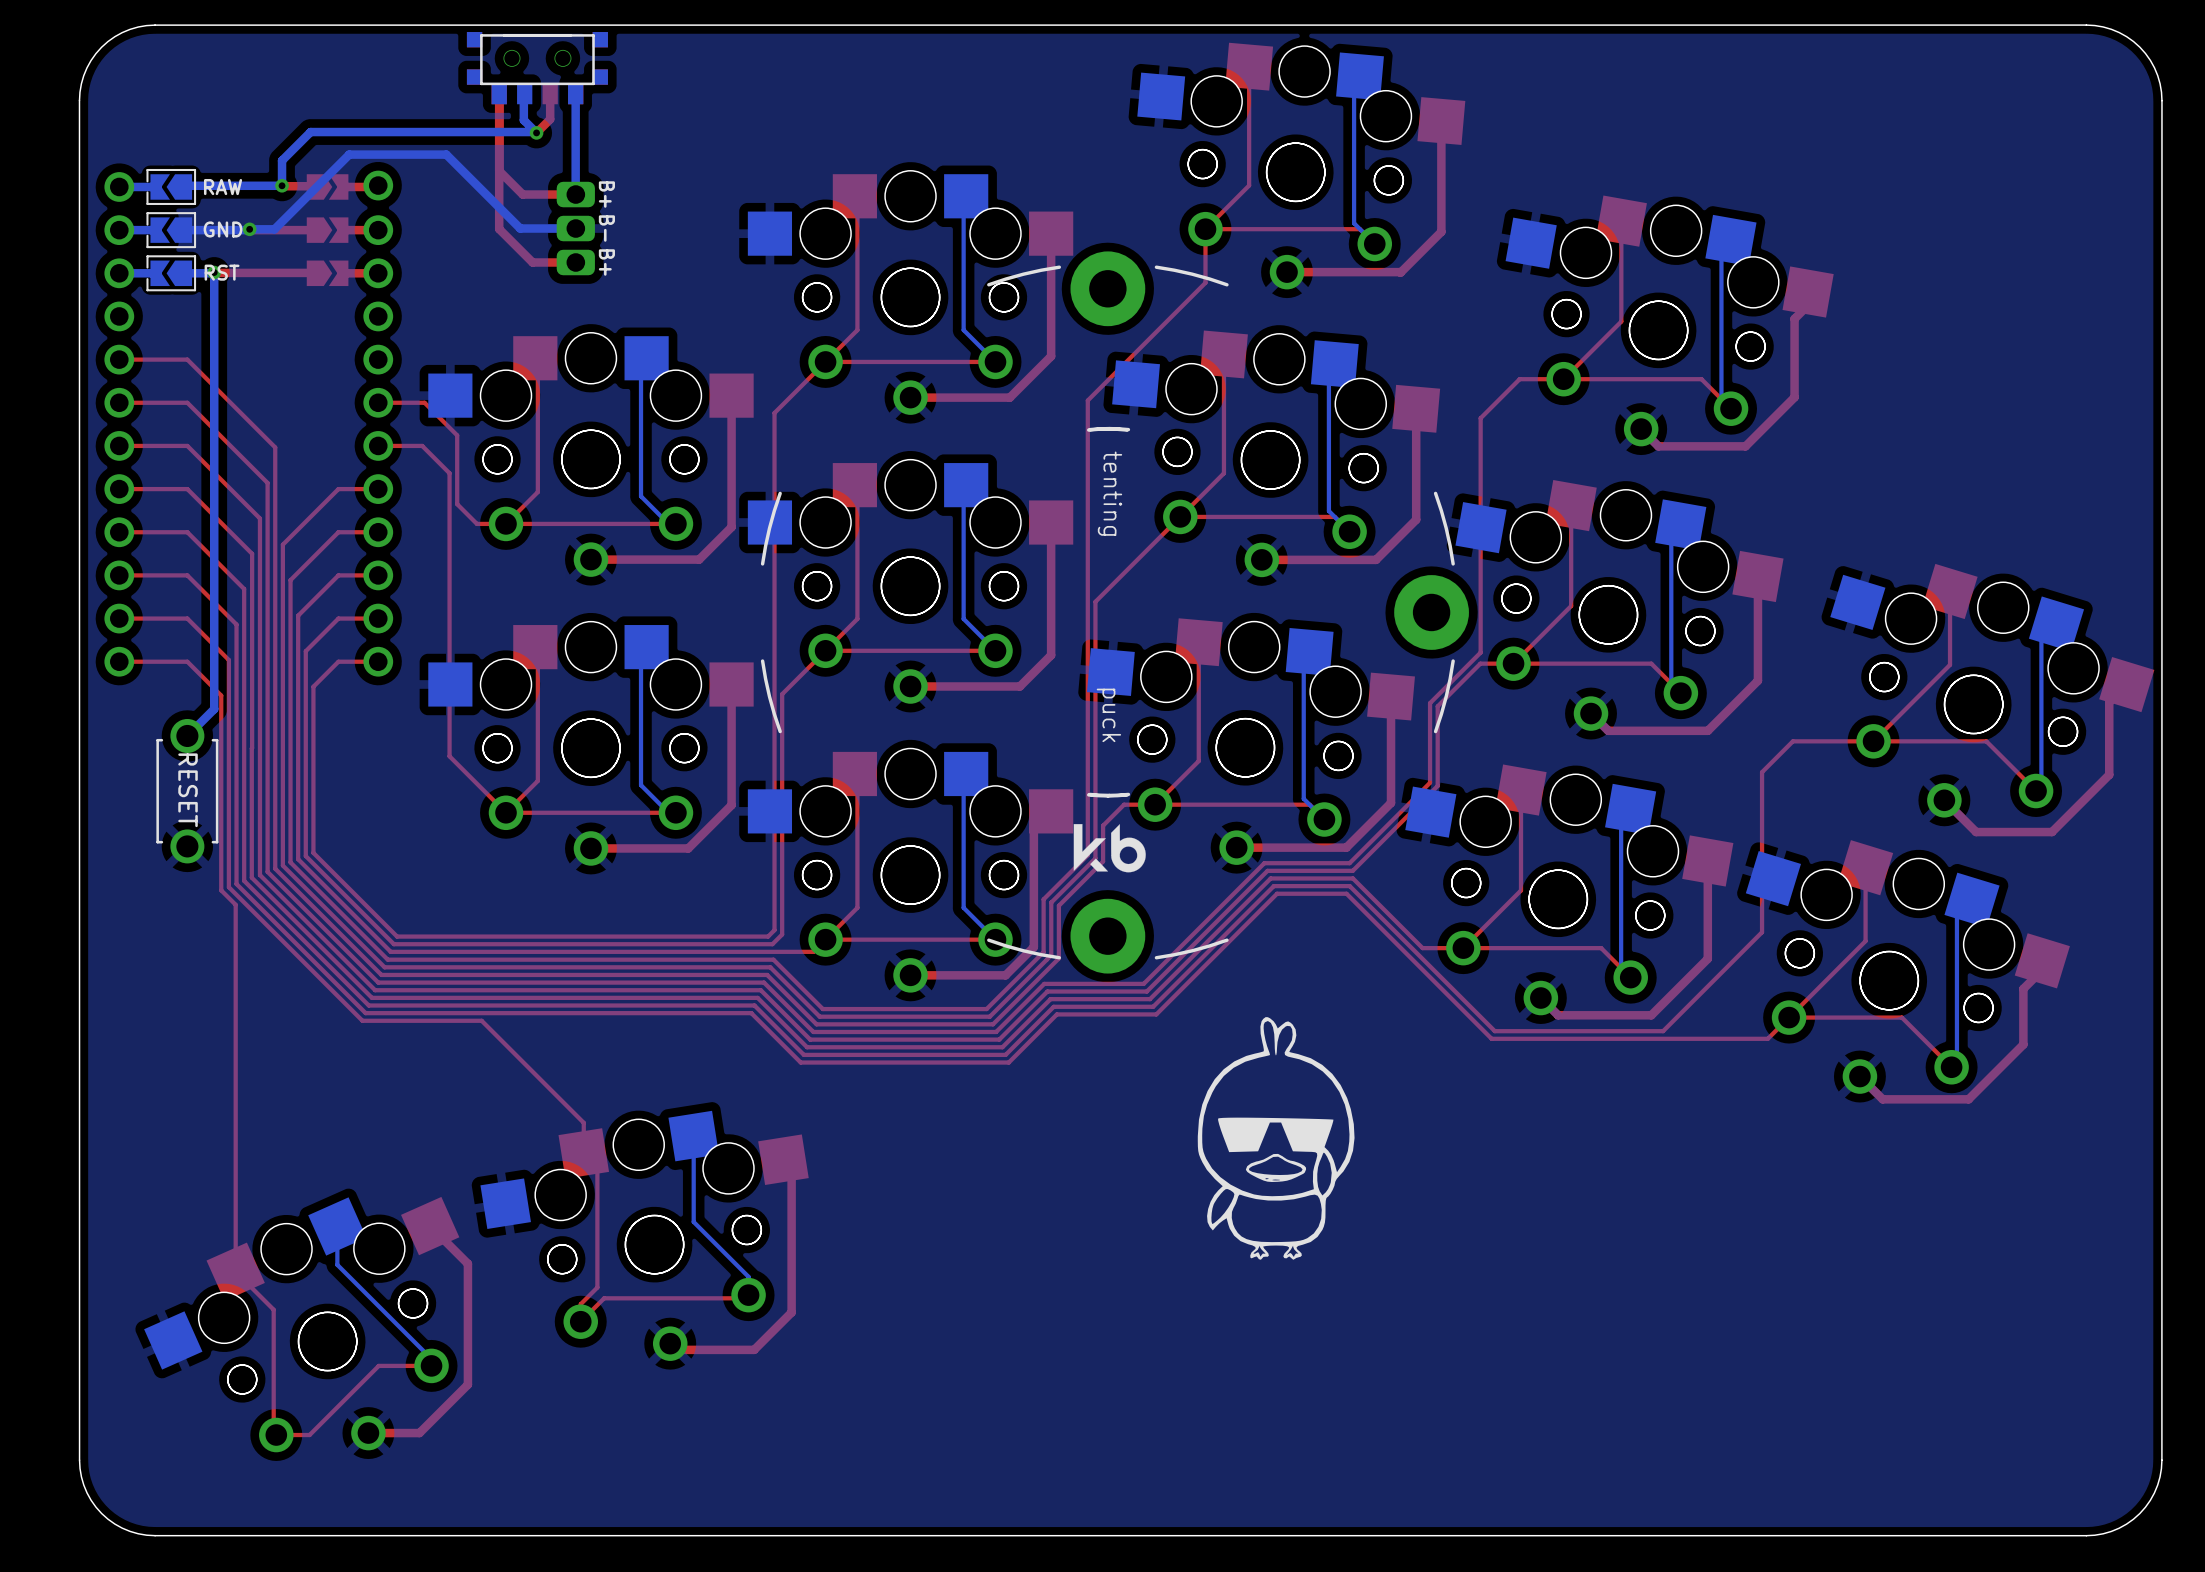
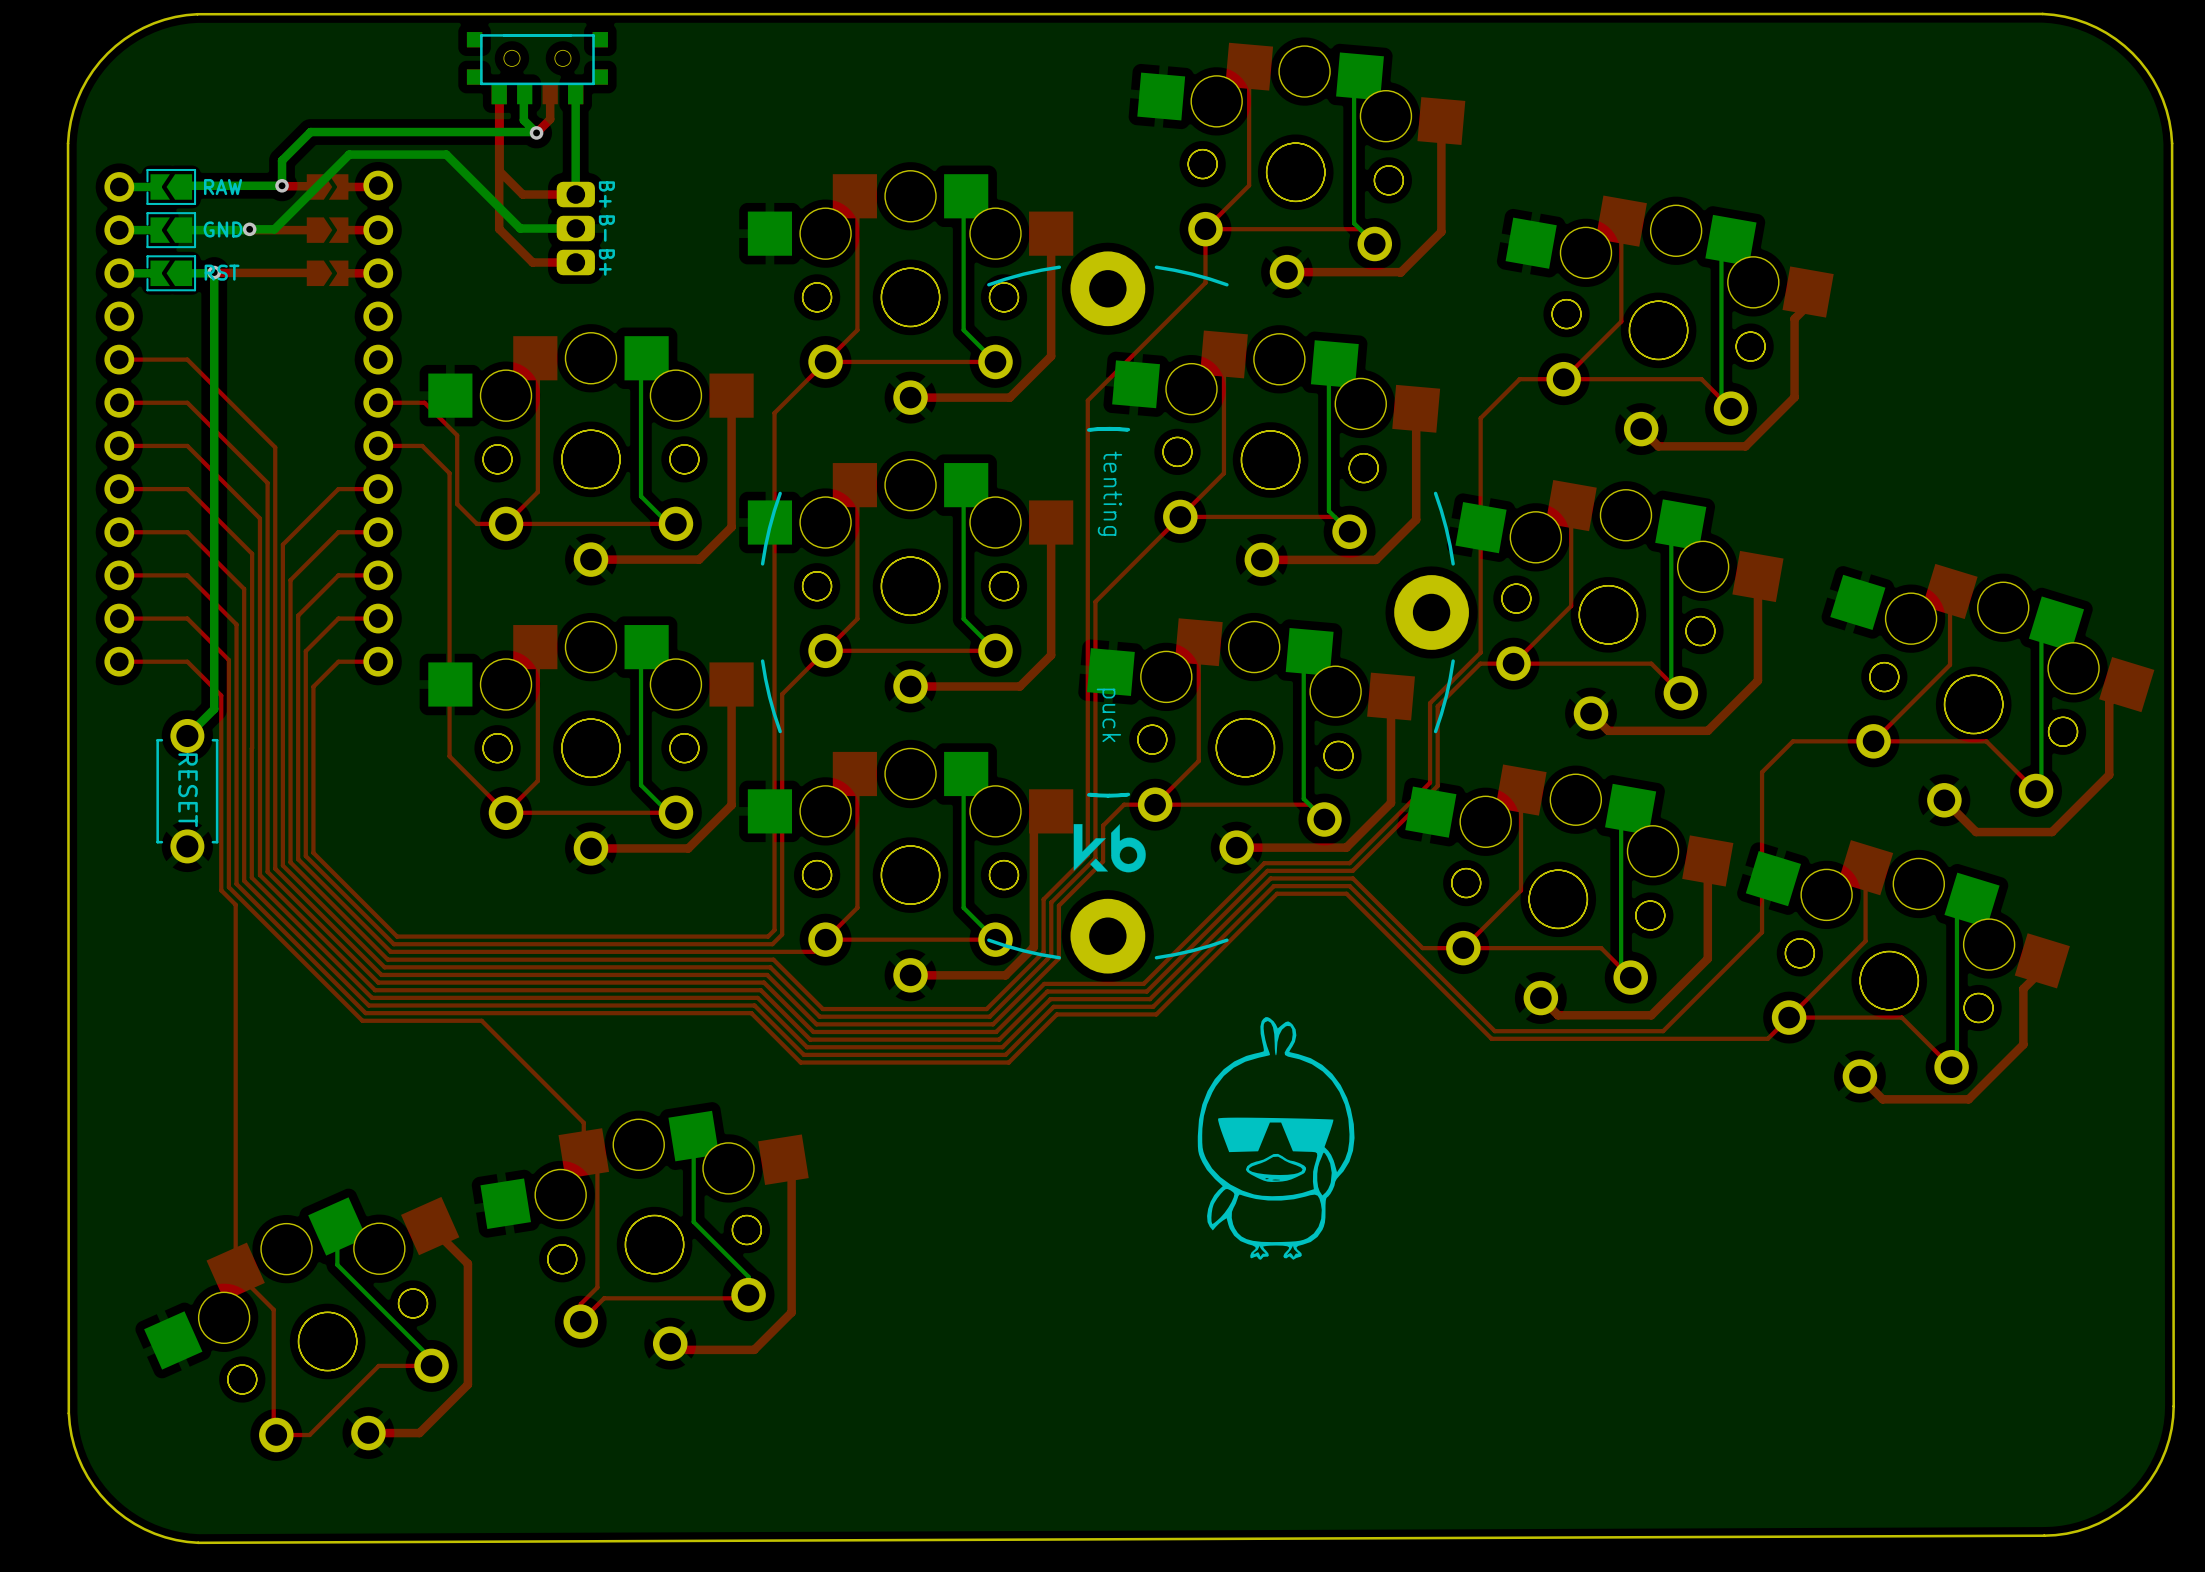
board edge: (2086, 25) (155, 25) (130, 29) (107, 41) (95, 53) (86, 67) (81, 83) (79, 100) (79, 1460) (83, 1485) (96, 1507) (107, 1519) (122, 1528) (138, 1533) (155, 1535) (2086, 1535) (2111, 1531) (2133, 1519) (2145, 1507) (2154, 1492) (2160, 1476) (2161, 1460) (2161, 100) (2160, 83) (2154, 67) (2139, 47) (2126, 36) (2111, 29) (2086, 25) -> (2042, 13) (2075, 19) (2096, 27) (2115, 39) (2132, 53) (2147, 70) (2158, 89) (2166, 110) (2172, 143) (2173, 1406) (2169, 1439) (2156, 1470) (2143, 1489) (2118, 1512) (2098, 1523) (2077, 1531) (2044, 1535) (198, 1542) (165, 1537) (134, 1523) (108, 1503) (93, 1486) (82, 1467) (74, 1446) (68, 1413) (68, 143) (70, 121) (81, 89) (99, 61) (124, 39) (153, 23) (175, 16) (197, 14) (2042, 13)

